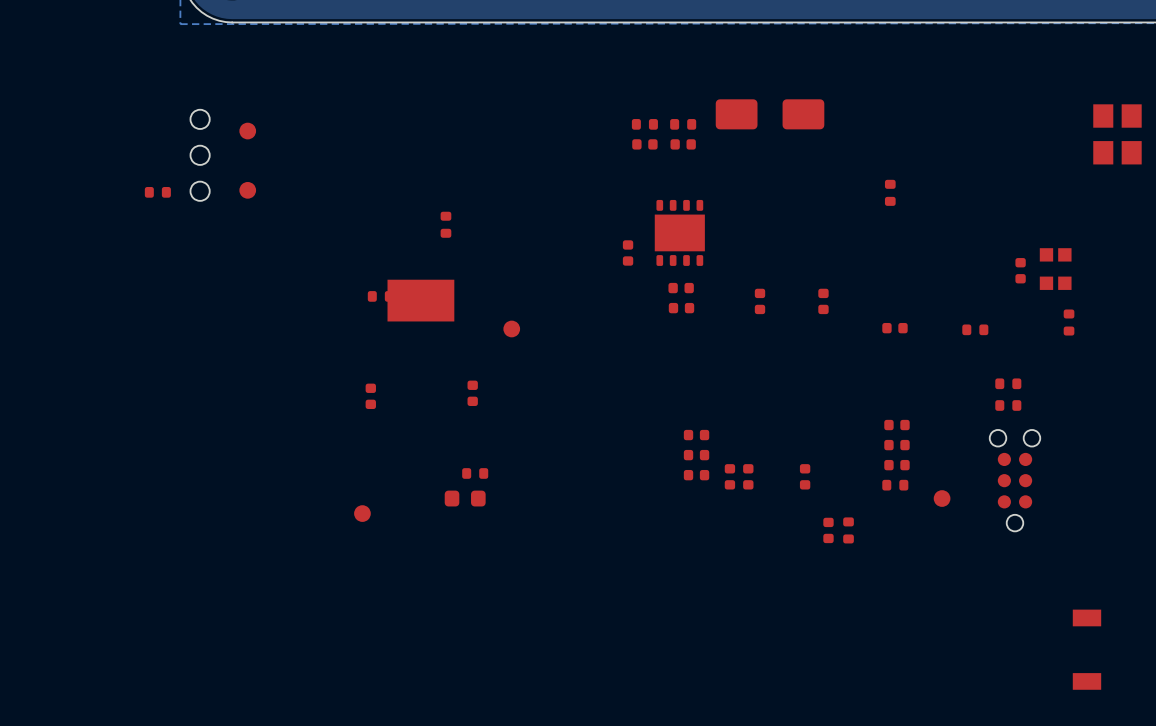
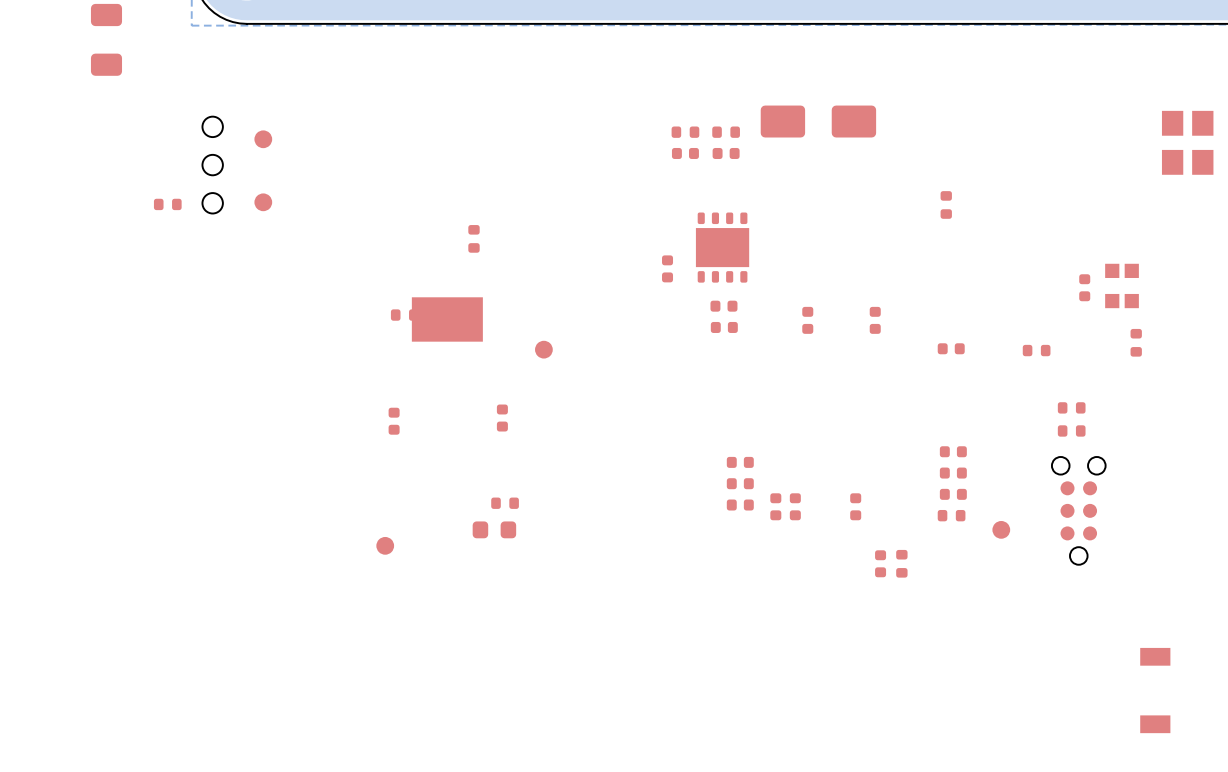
part: none -> (106, 39)

